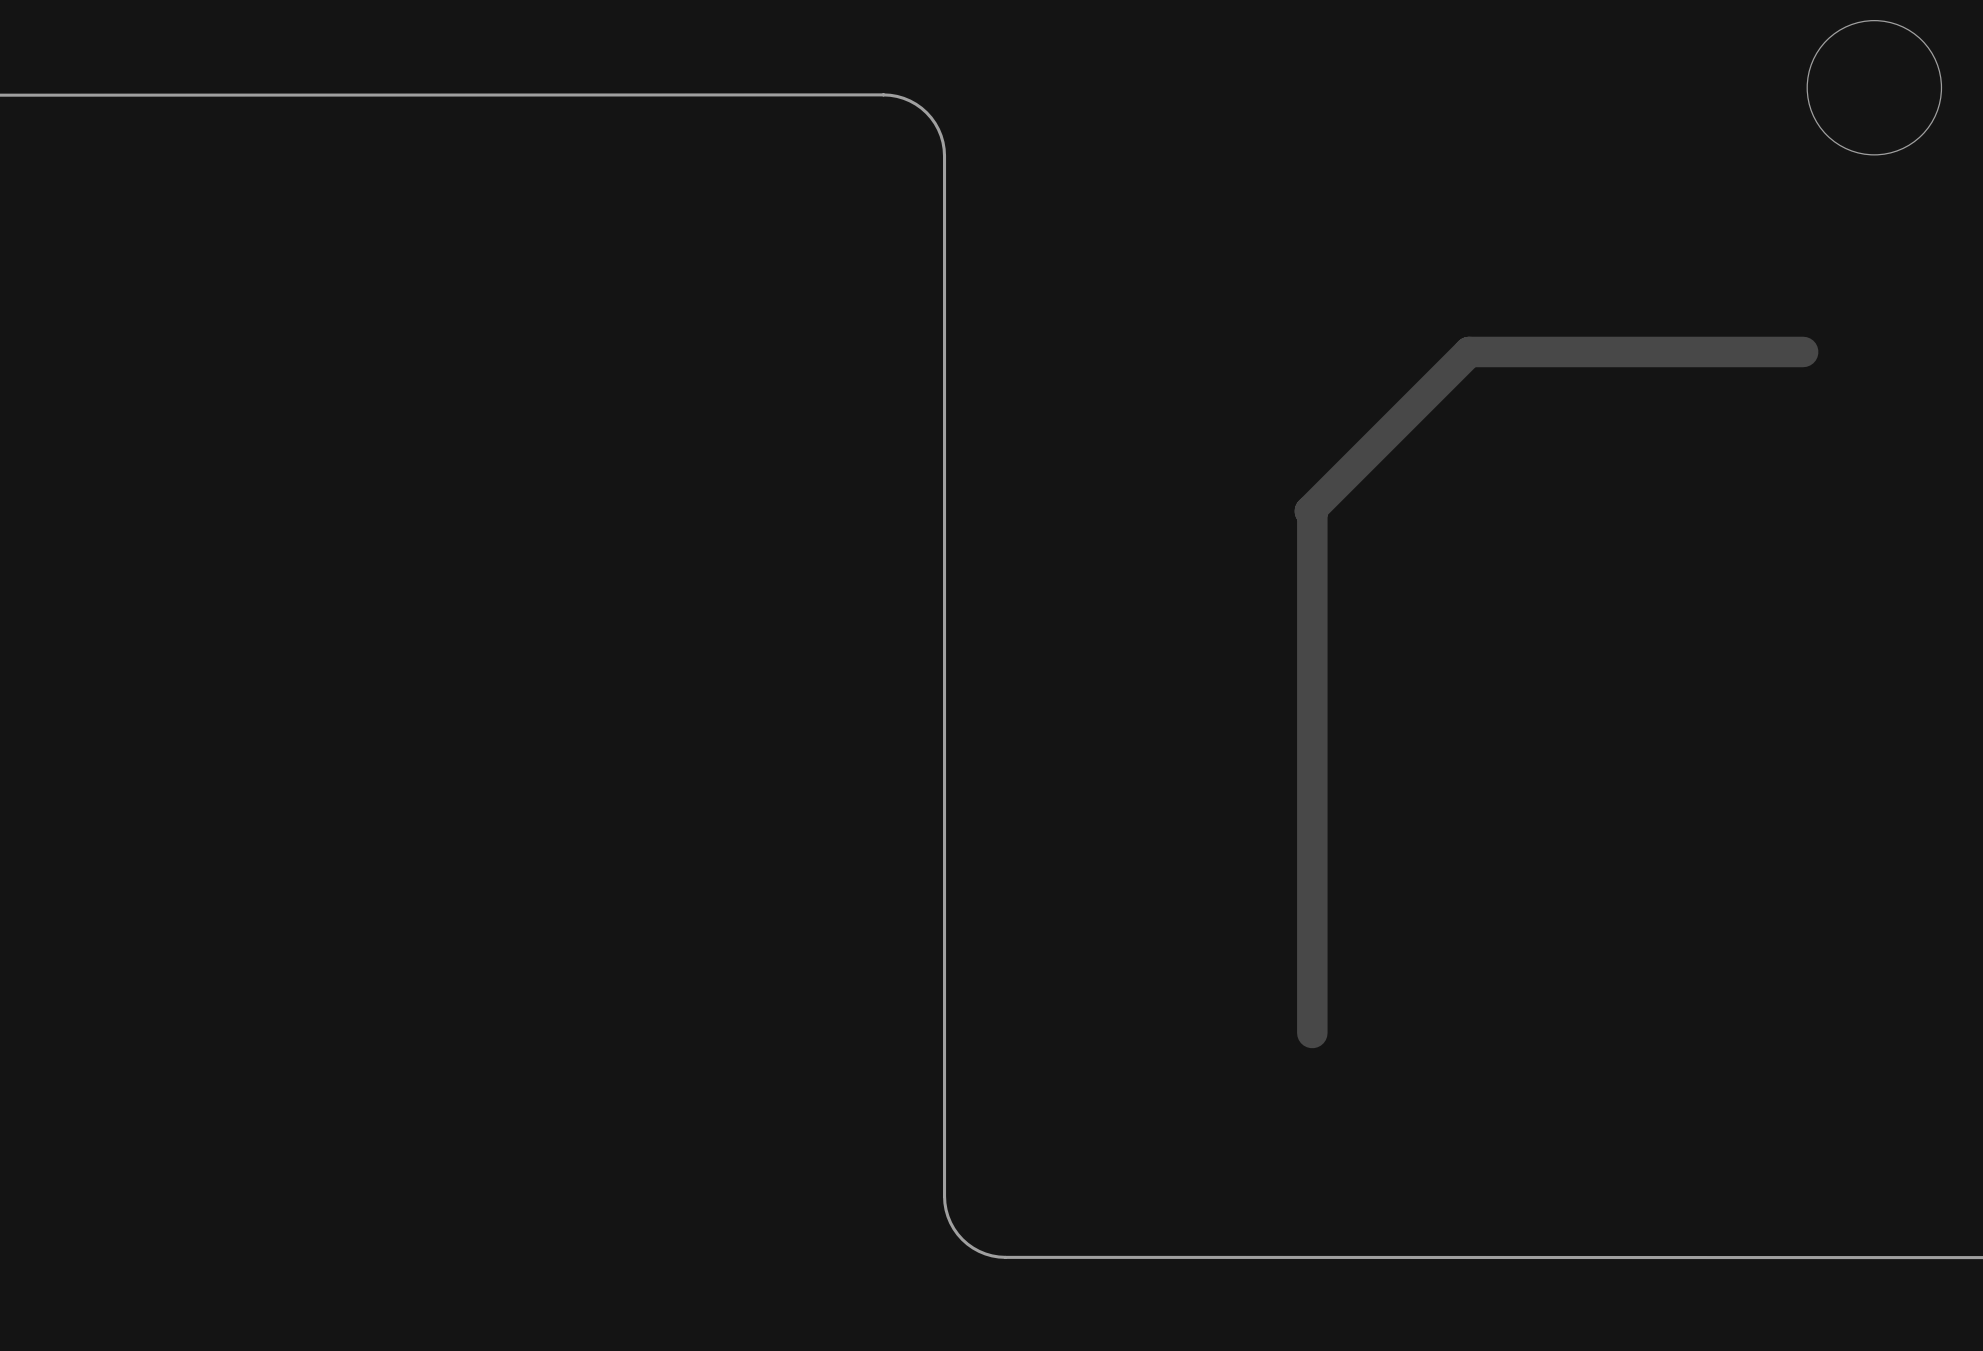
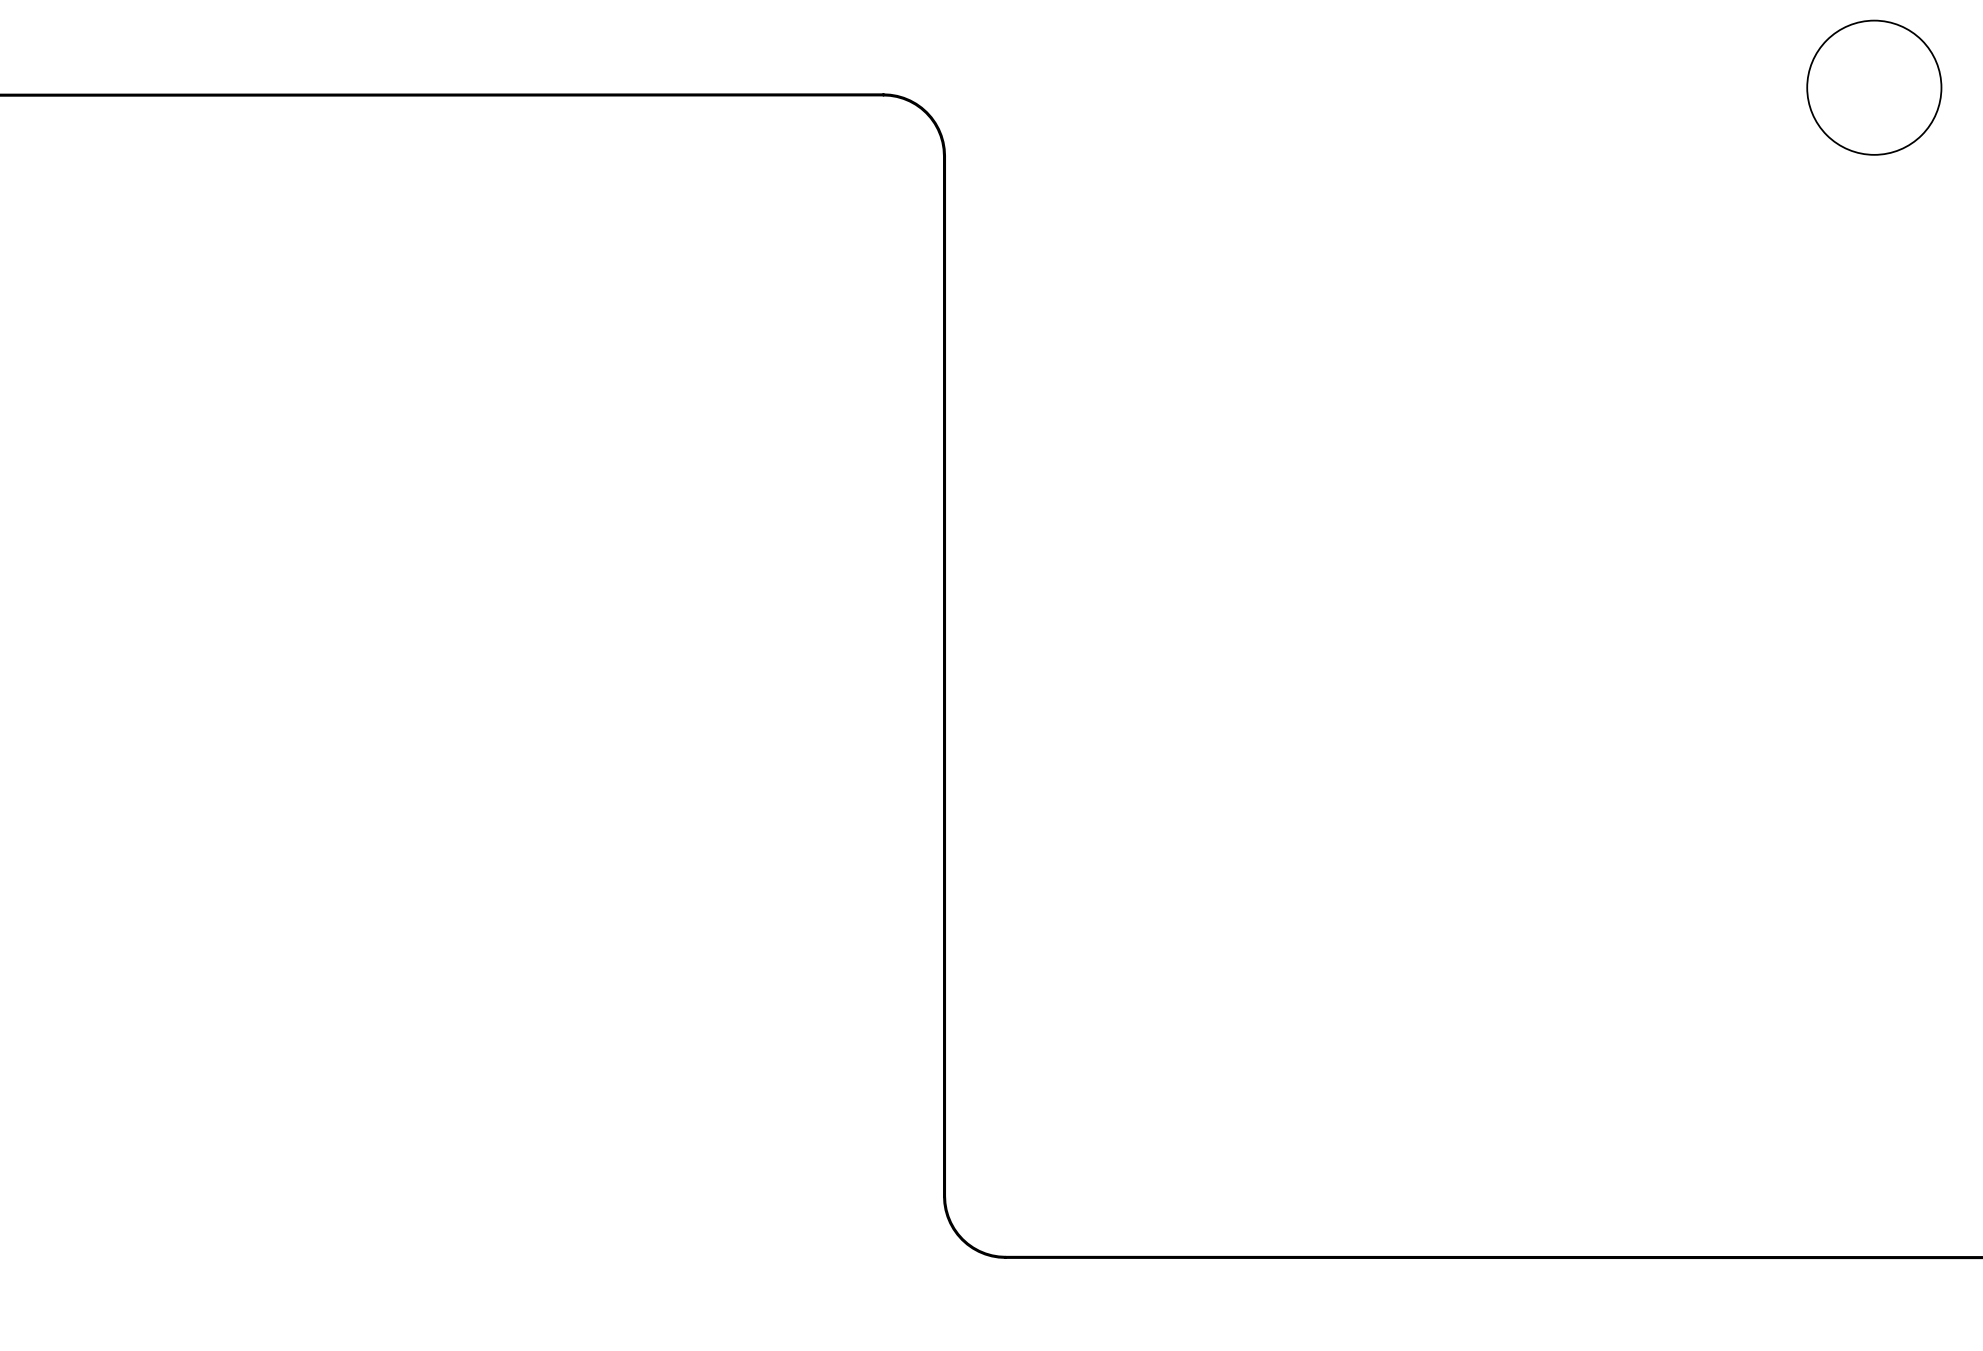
track: (1803, 351) (1469, 351) (1309, 511) (1312, 513) (1312, 1032) -> none

